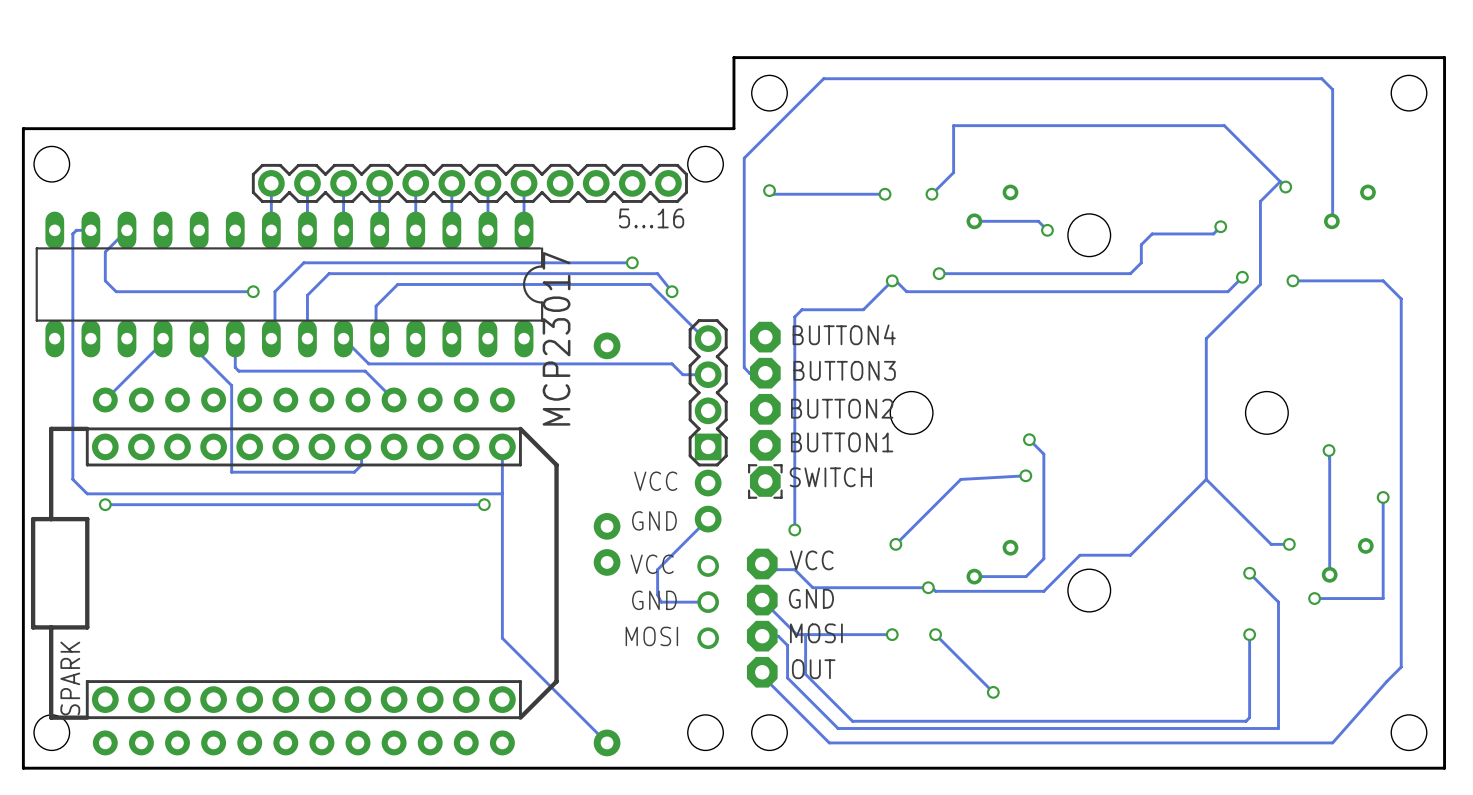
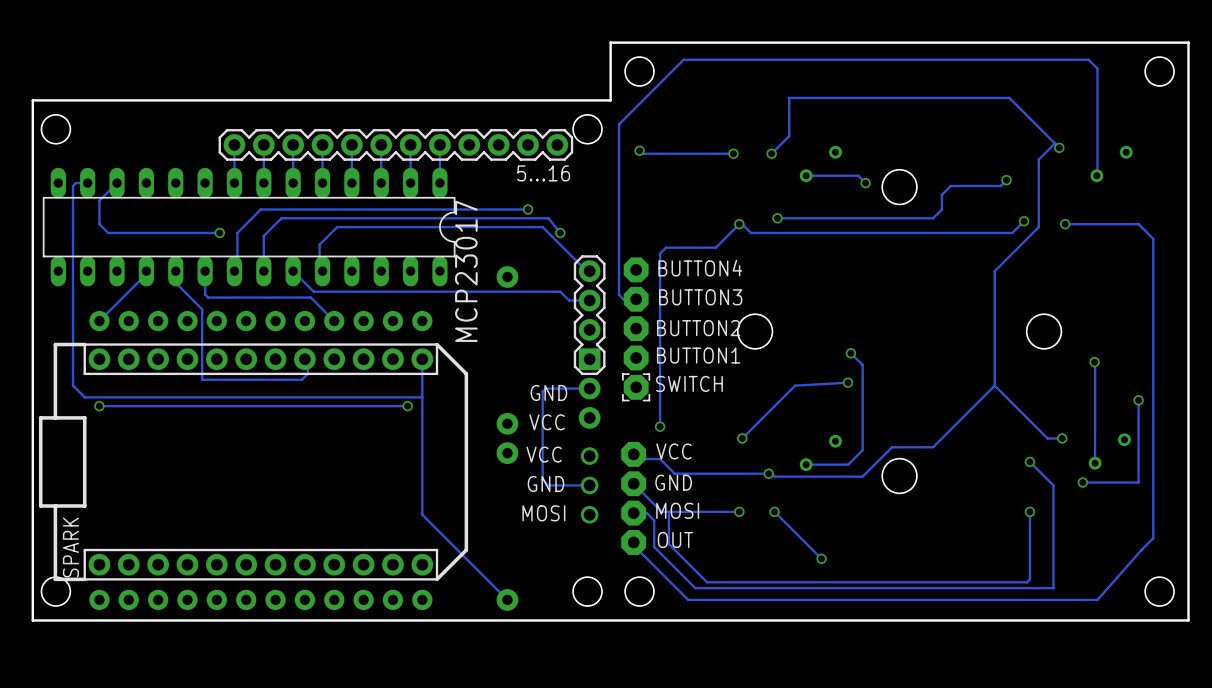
text: VCC (655, 481) -> GND (548, 392)
track: (708, 519) (657, 569) (657, 594) (661, 602) -> (589, 388) (545, 388) (542, 391) (542, 479) (548, 485) (551, 485)
text: GND (654, 520) -> VCC (547, 422)

